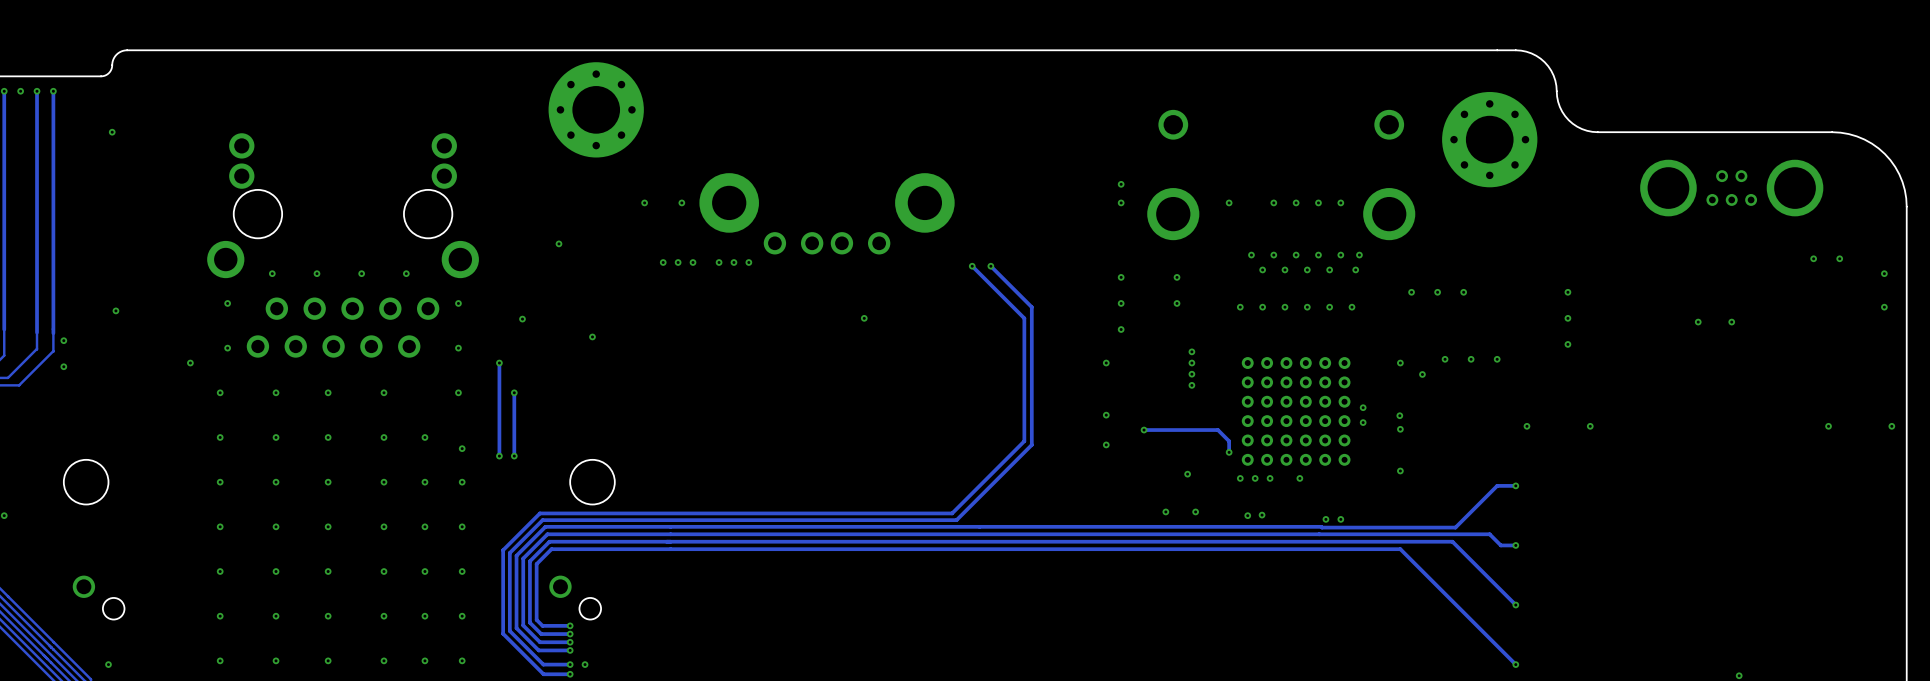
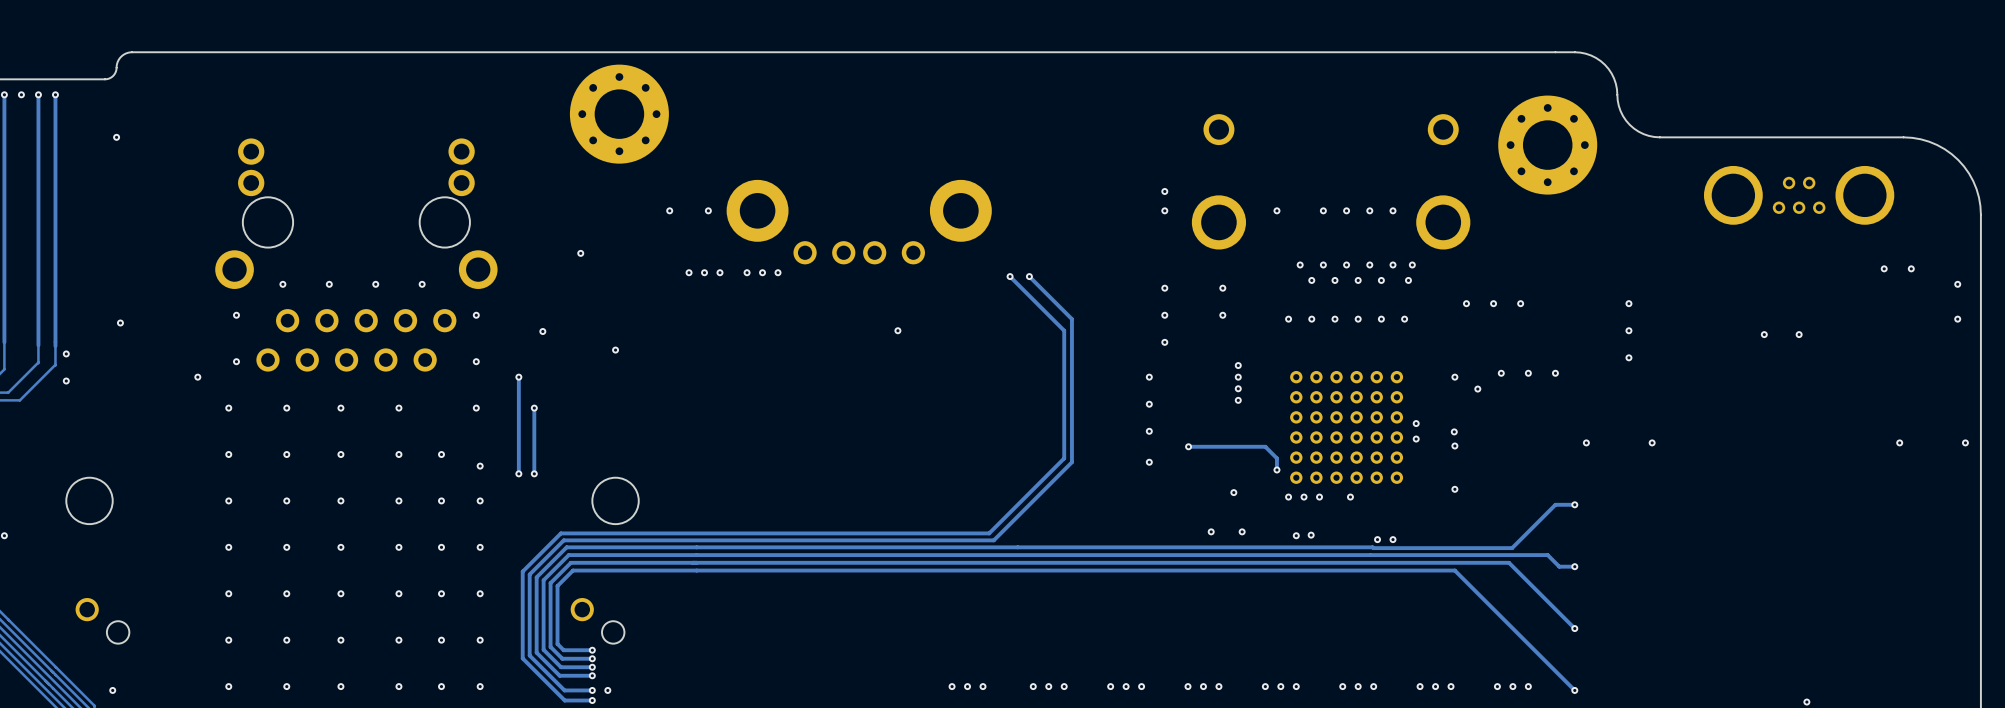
via: none -> (1149, 404)
via: none -> (952, 686)
via: none -> (967, 686)
via: none -> (983, 686)
via: none -> (1033, 686)
via: none -> (1048, 686)
via: none -> (1064, 686)
via: none -> (1110, 686)
via: none -> (1126, 686)
via: none -> (1141, 686)
via: none -> (1188, 686)
via: none -> (1203, 686)
via: none -> (1218, 686)
via: none -> (1265, 686)
via: none -> (1280, 686)
via: none -> (1296, 686)
via: none -> (1342, 686)
via: none -> (1358, 686)
via: none -> (1373, 686)
via: none -> (1420, 686)
via: none -> (1435, 686)
via: none -> (1451, 686)
via: none -> (1497, 686)
via: none -> (1512, 686)
via: none -> (1528, 686)

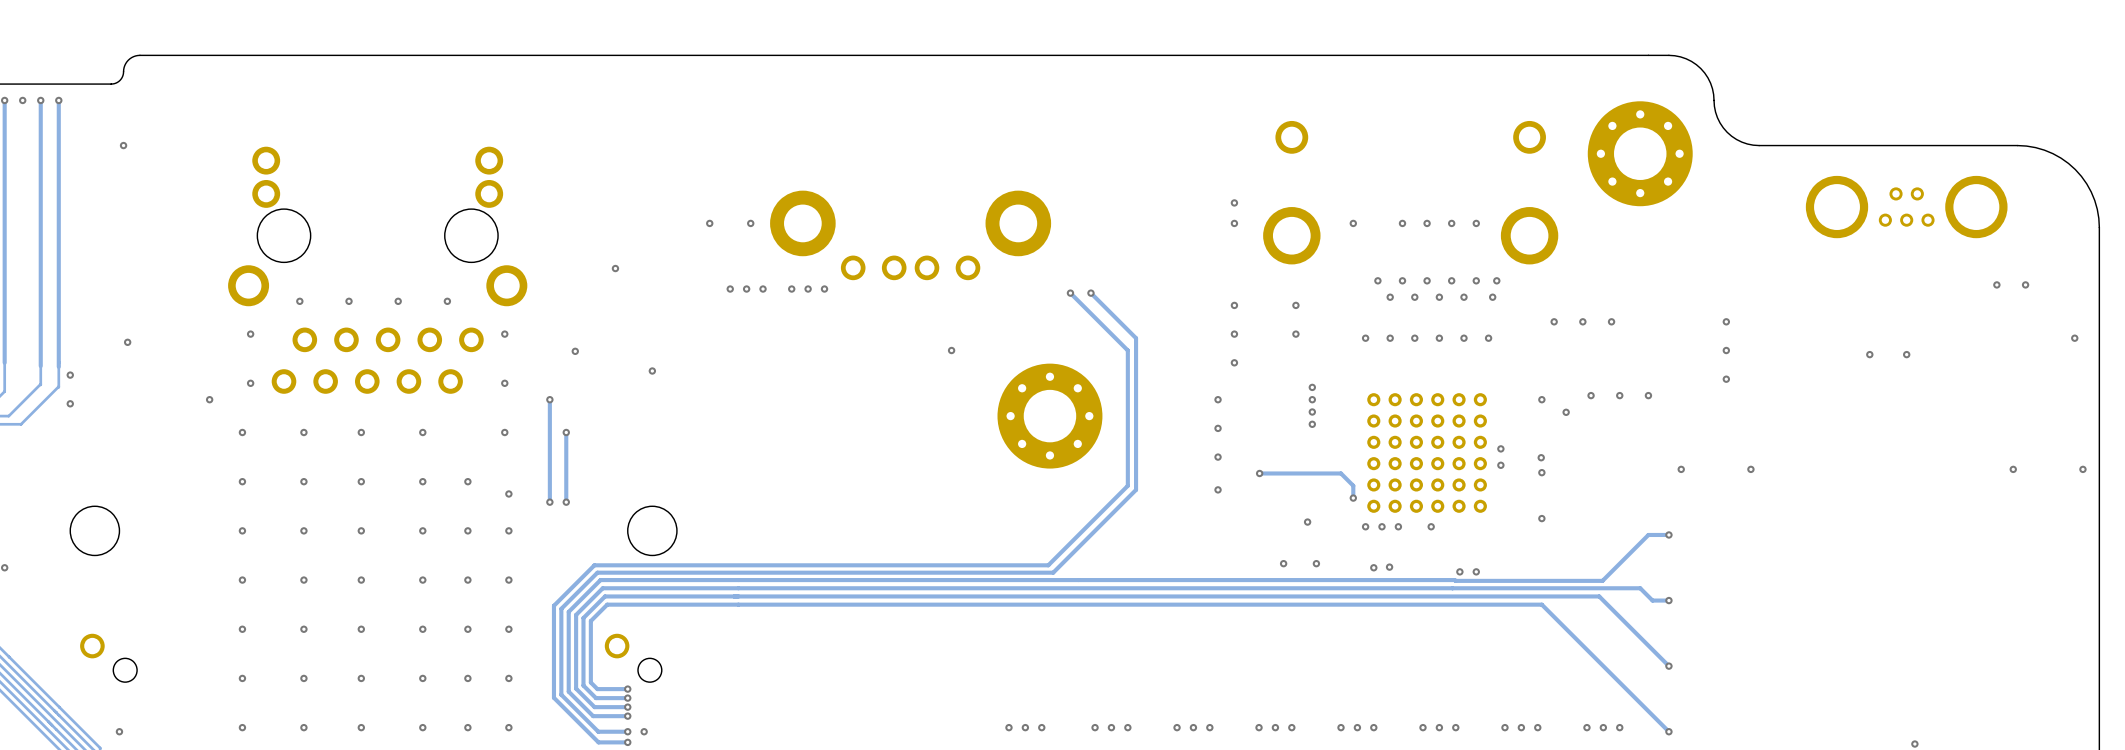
part: (619, 114) -> none
via: (1957, 284) -> none
part: none -> (1049, 416)

